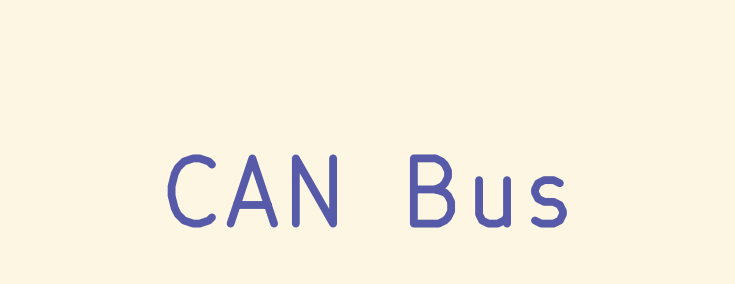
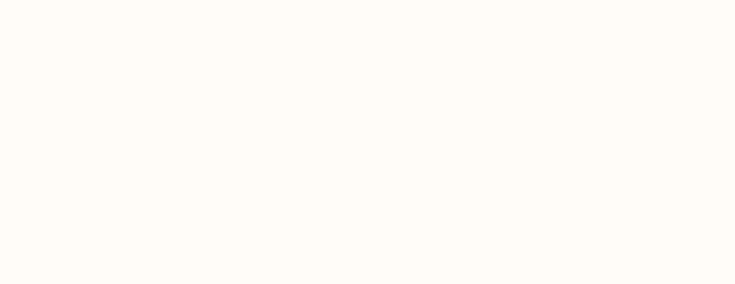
text: CAN Bus (367, 190) -> none

